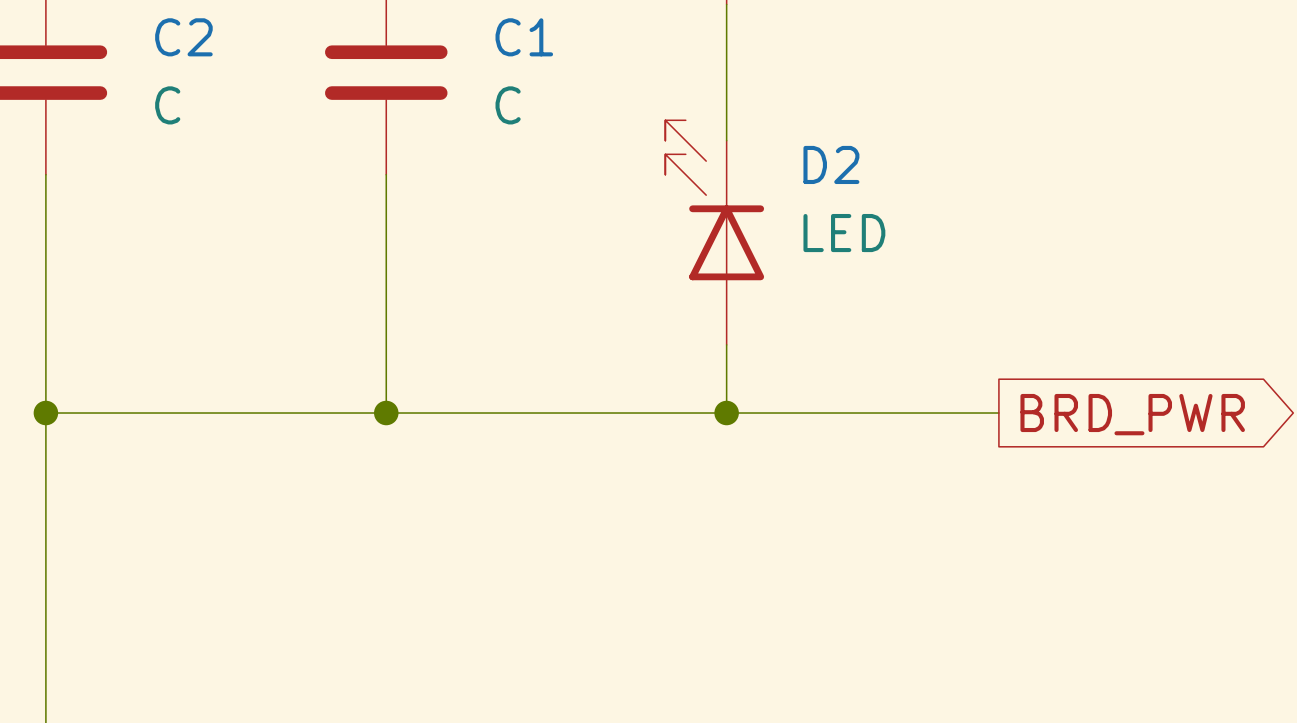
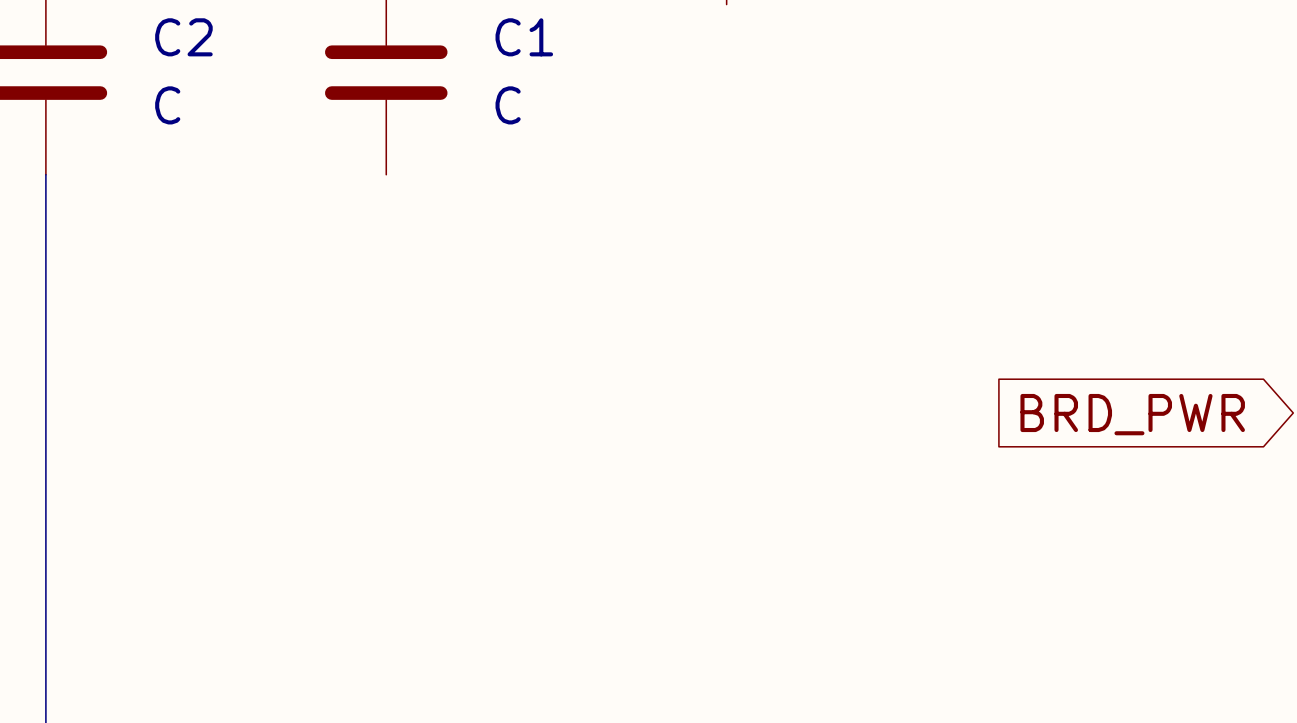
wire: (726, 4) (726, 140) -> none
wire: (386, 174) (386, 413) -> none
D2: LED (714, 232) -> none
wire: (726, 344) (726, 413) -> none
wire: (45, 413) (998, 413) -> none
junction: (45, 413) -> none
junction: (386, 413) -> none
junction: (726, 413) -> none

